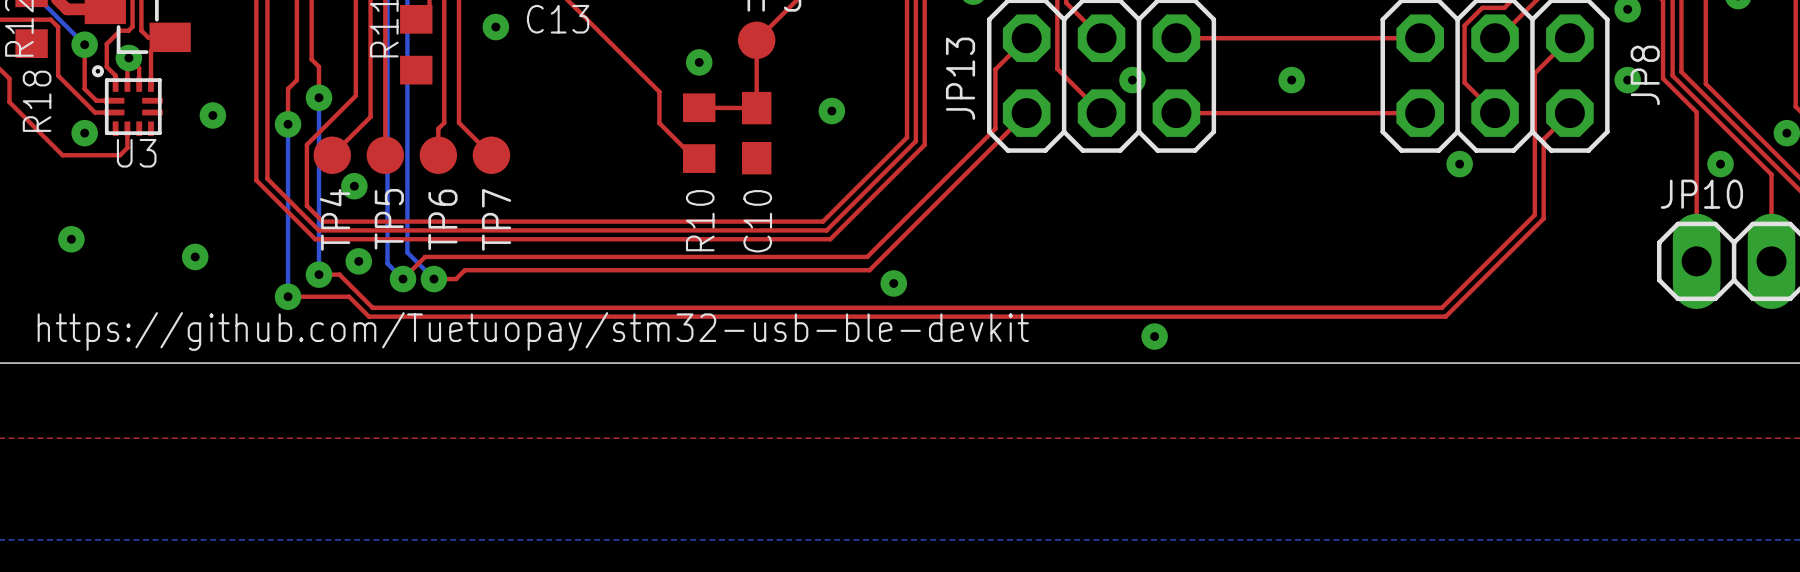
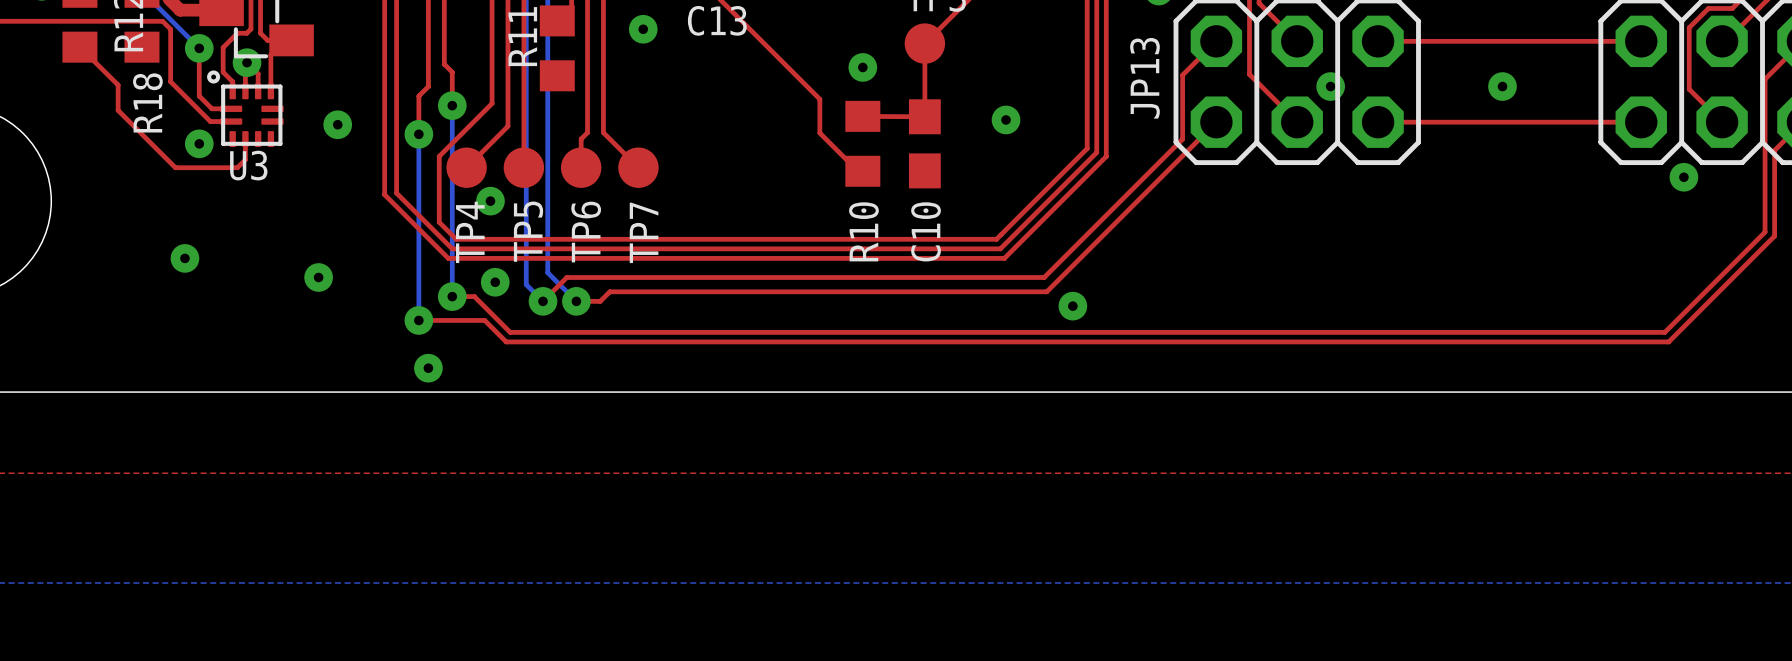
text: https://github.com/Tuetuopay/stm32-usb-ble-devkit (533, 331) -> none
via: (1154, 336) -> none
via: none -> (428, 368)

